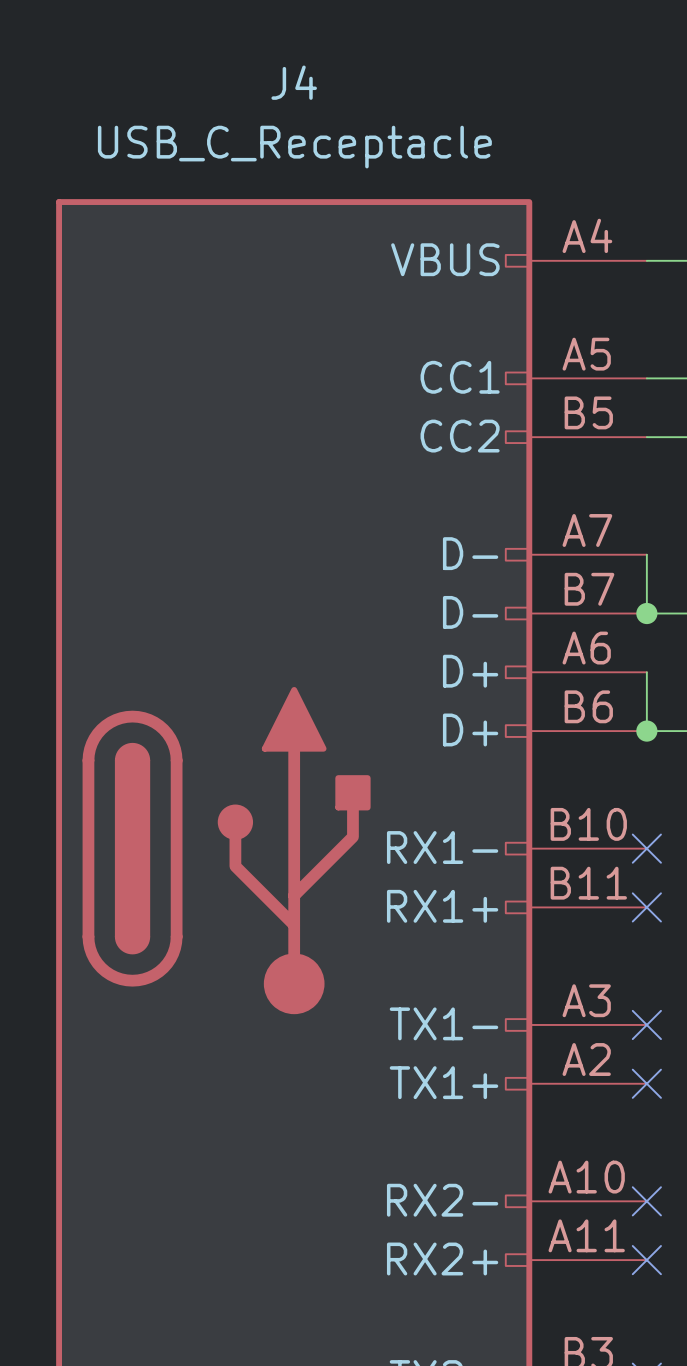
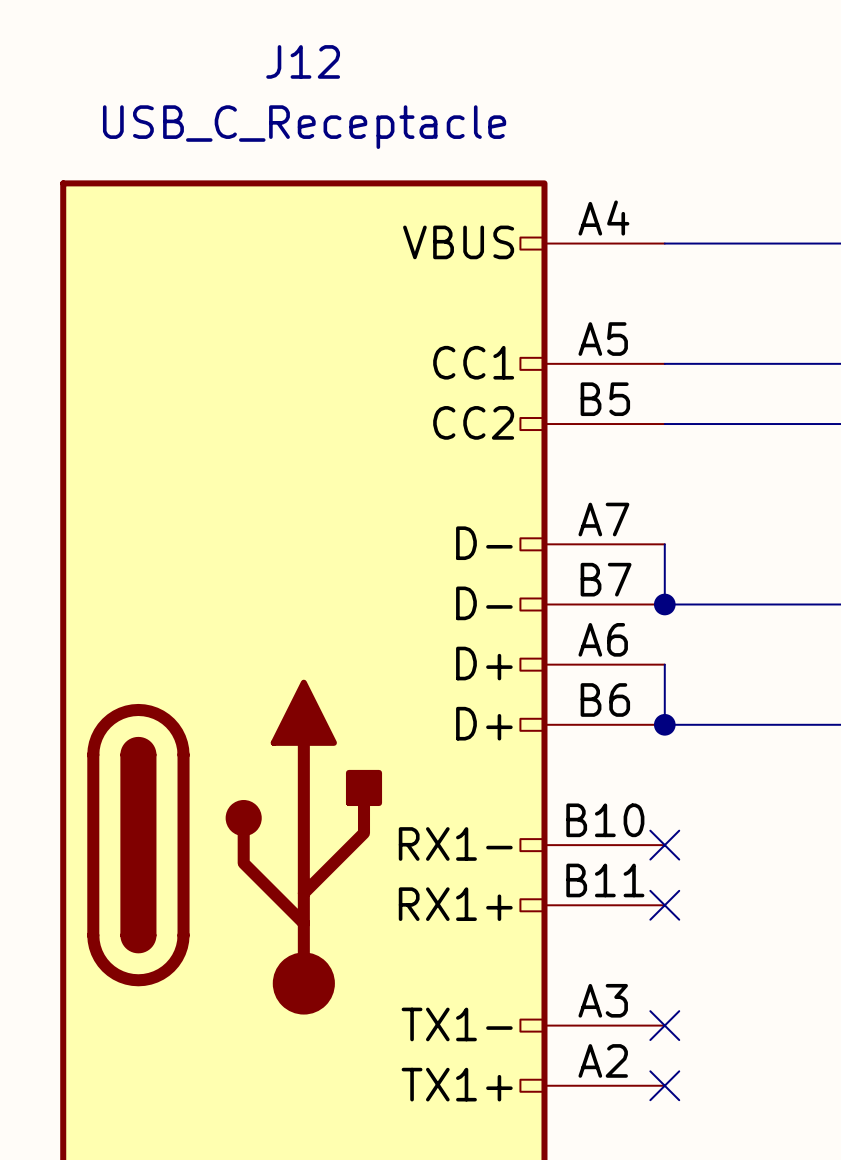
J4 name: J4 (294, 82) -> J12 (303, 61)

